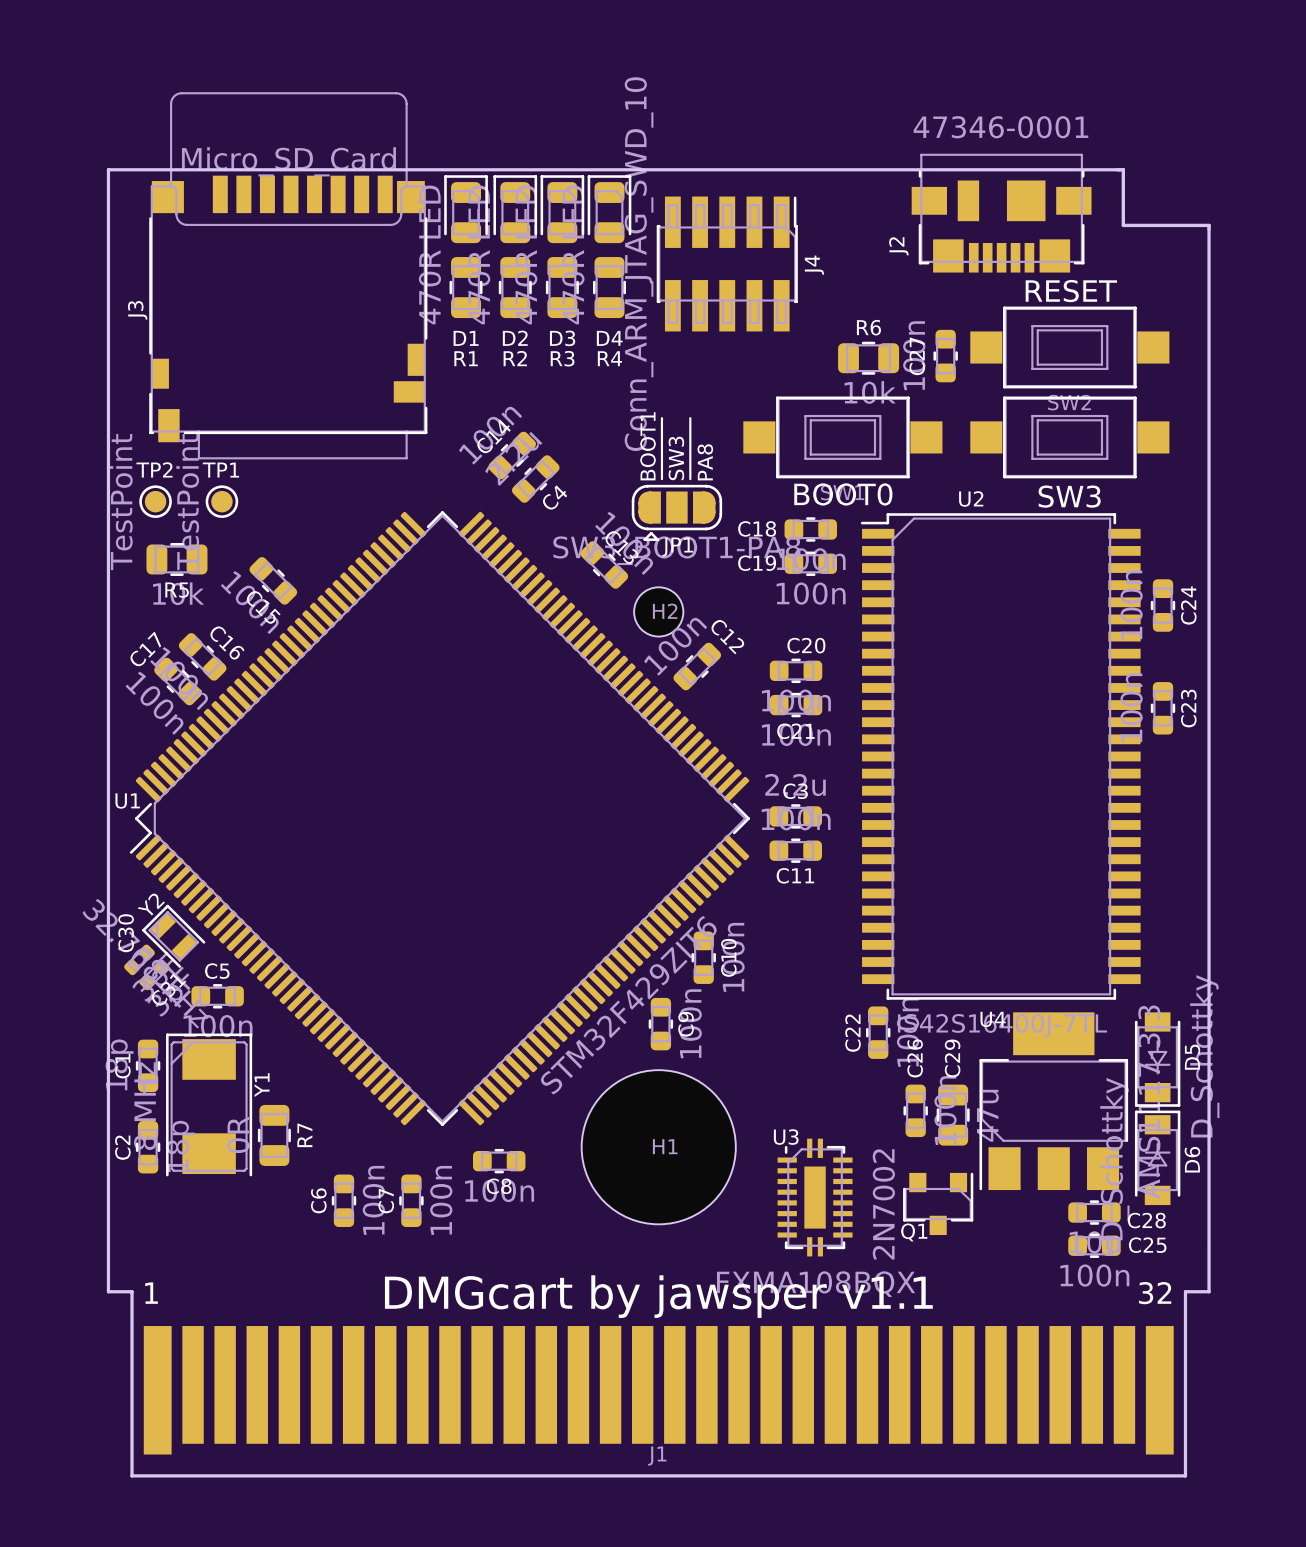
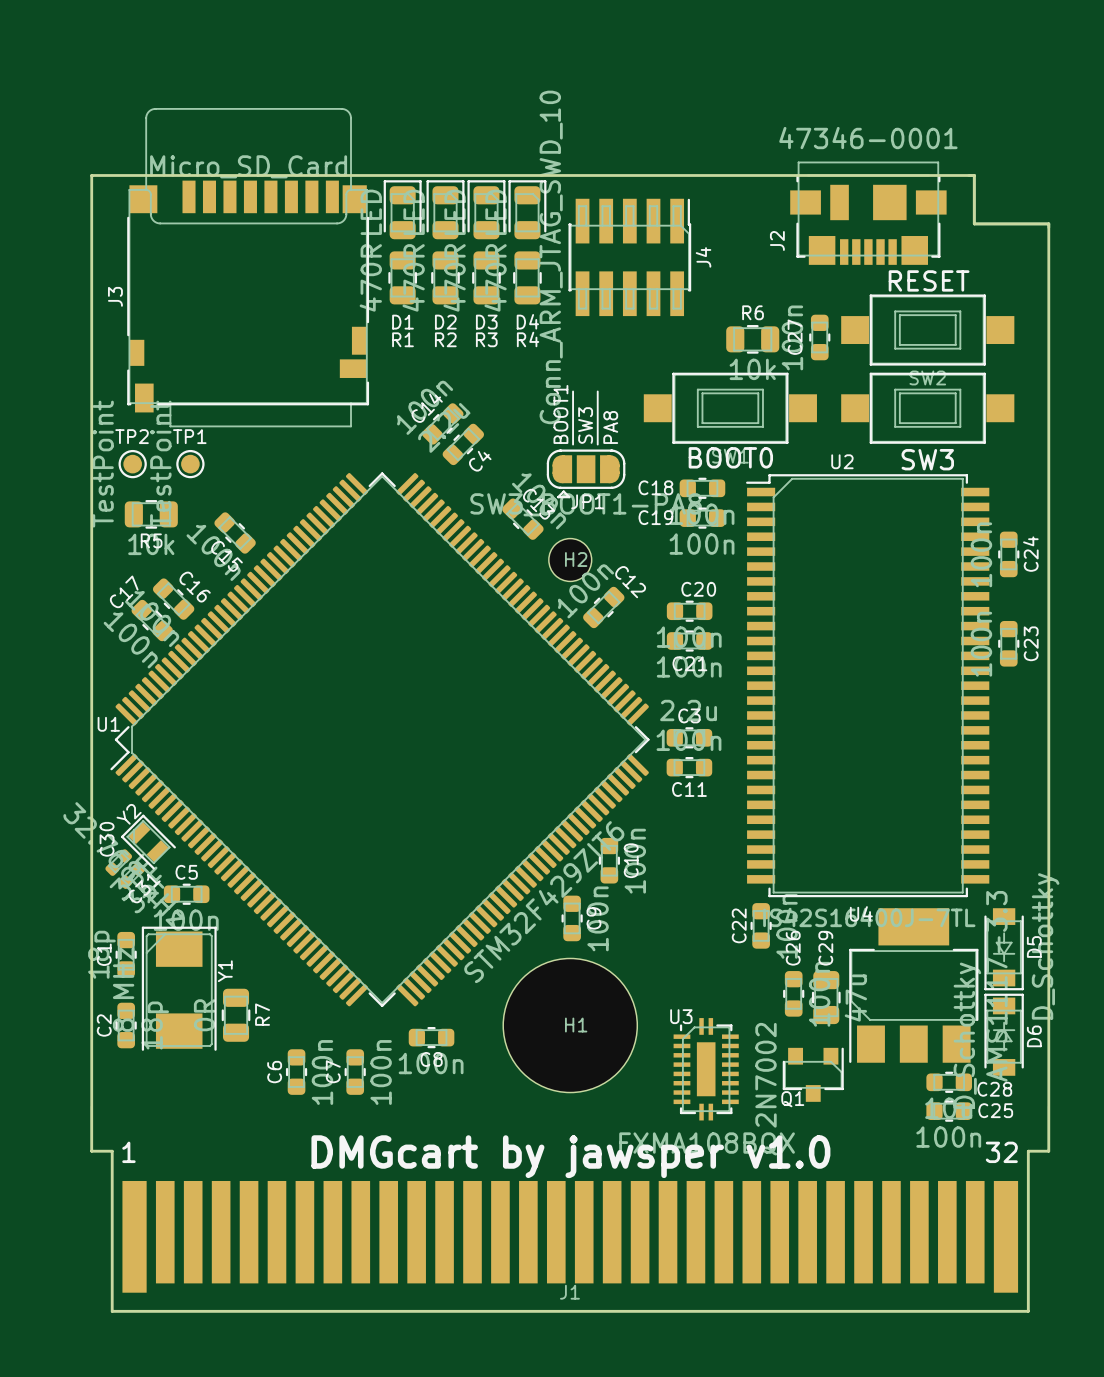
text: DMGcart by jawsper v1.1 (658, 1296) -> DMGcart by jawsper v1.0 (570, 1156)

